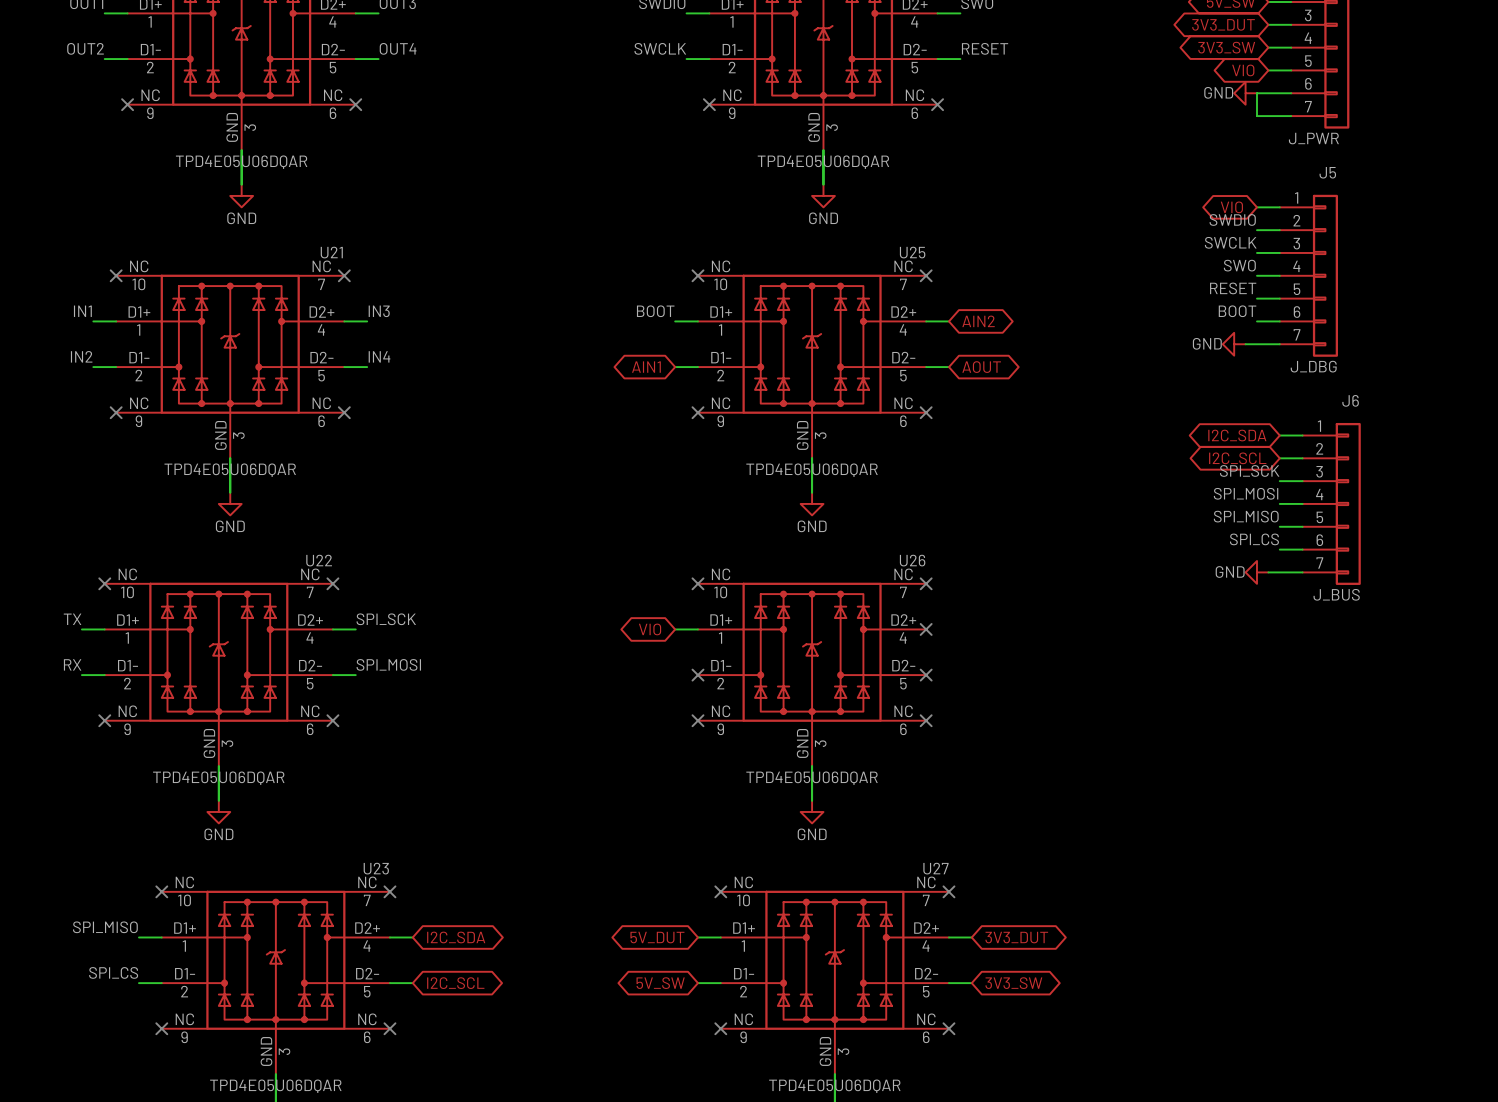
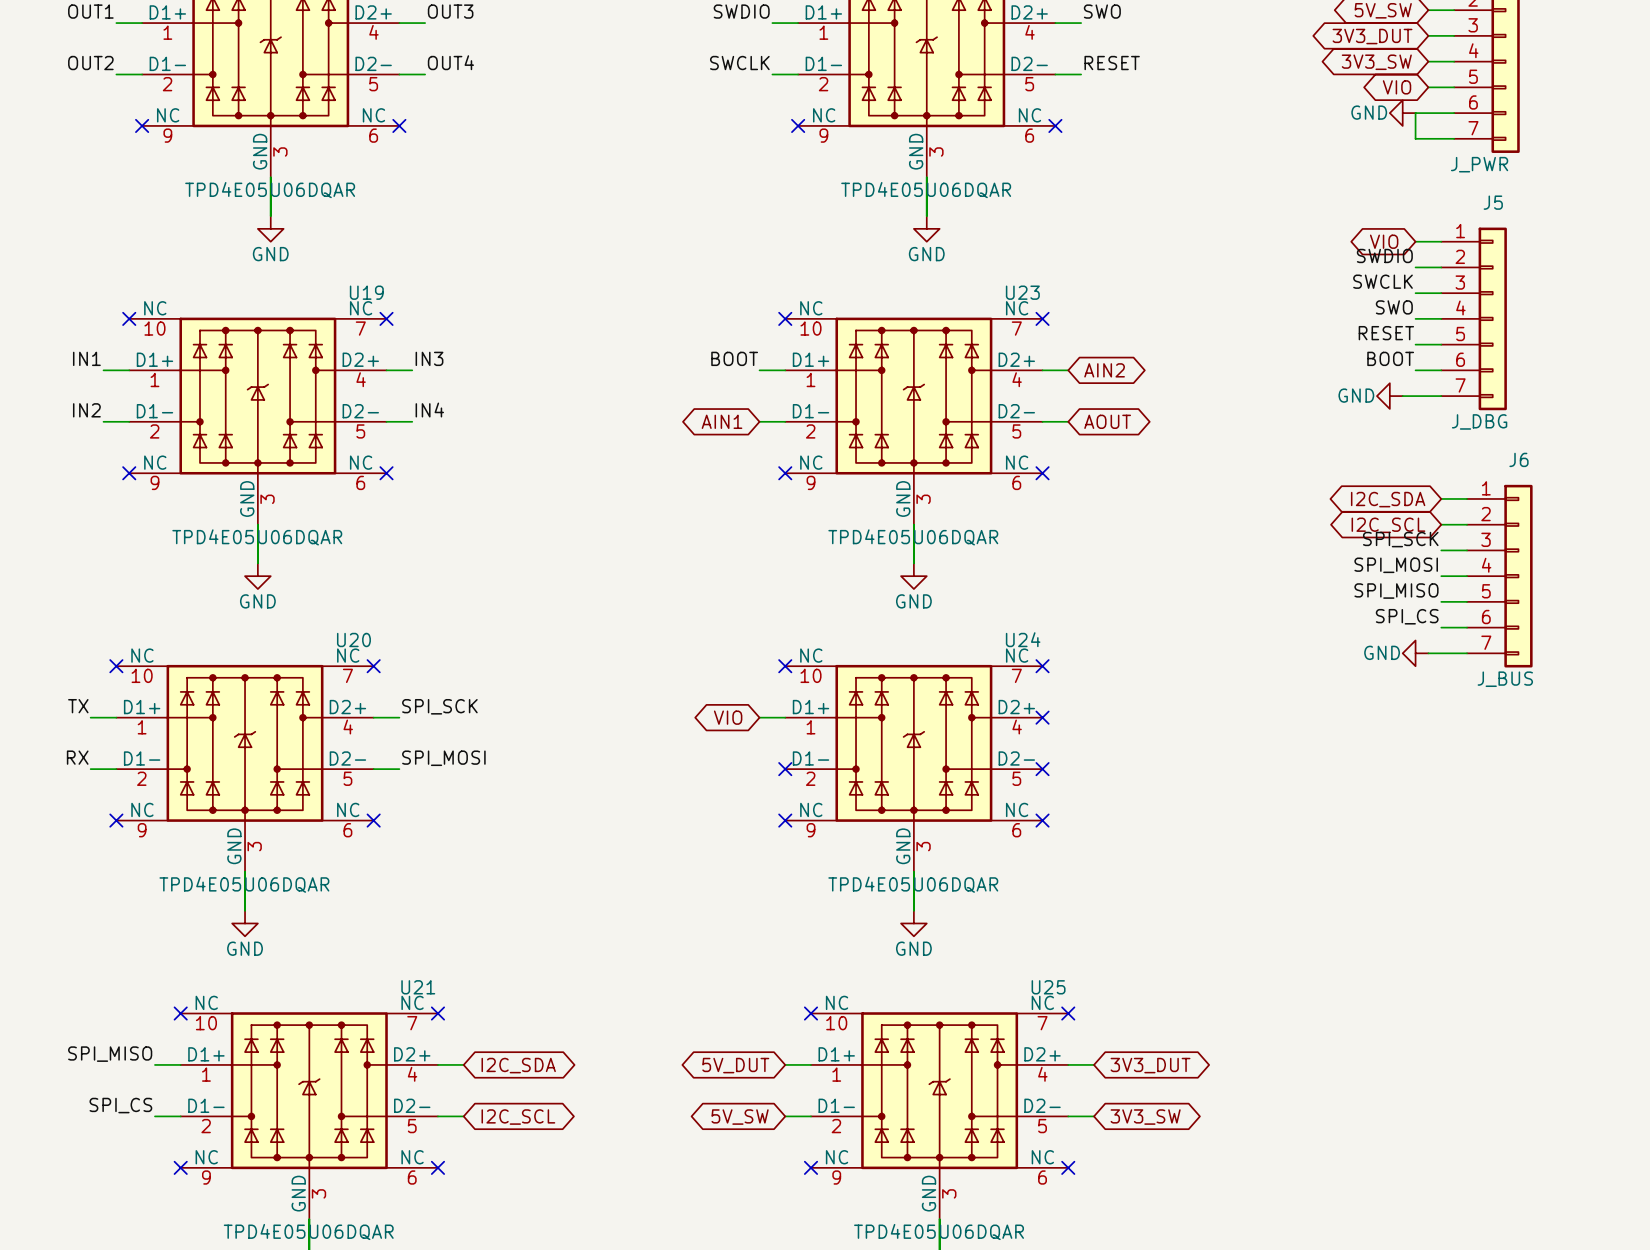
U21 name: U21 (331, 252) -> U19 (366, 292)
U25 name: U25 (912, 252) -> U23 (1022, 292)
U22 name: U22 (319, 560) -> U20 (353, 640)
U26 name: U26 (912, 560) -> U24 (1023, 639)
U23 name: U23 (376, 868) -> U21 (418, 987)
U27 name: U27 (935, 868) -> U25 (1048, 987)

